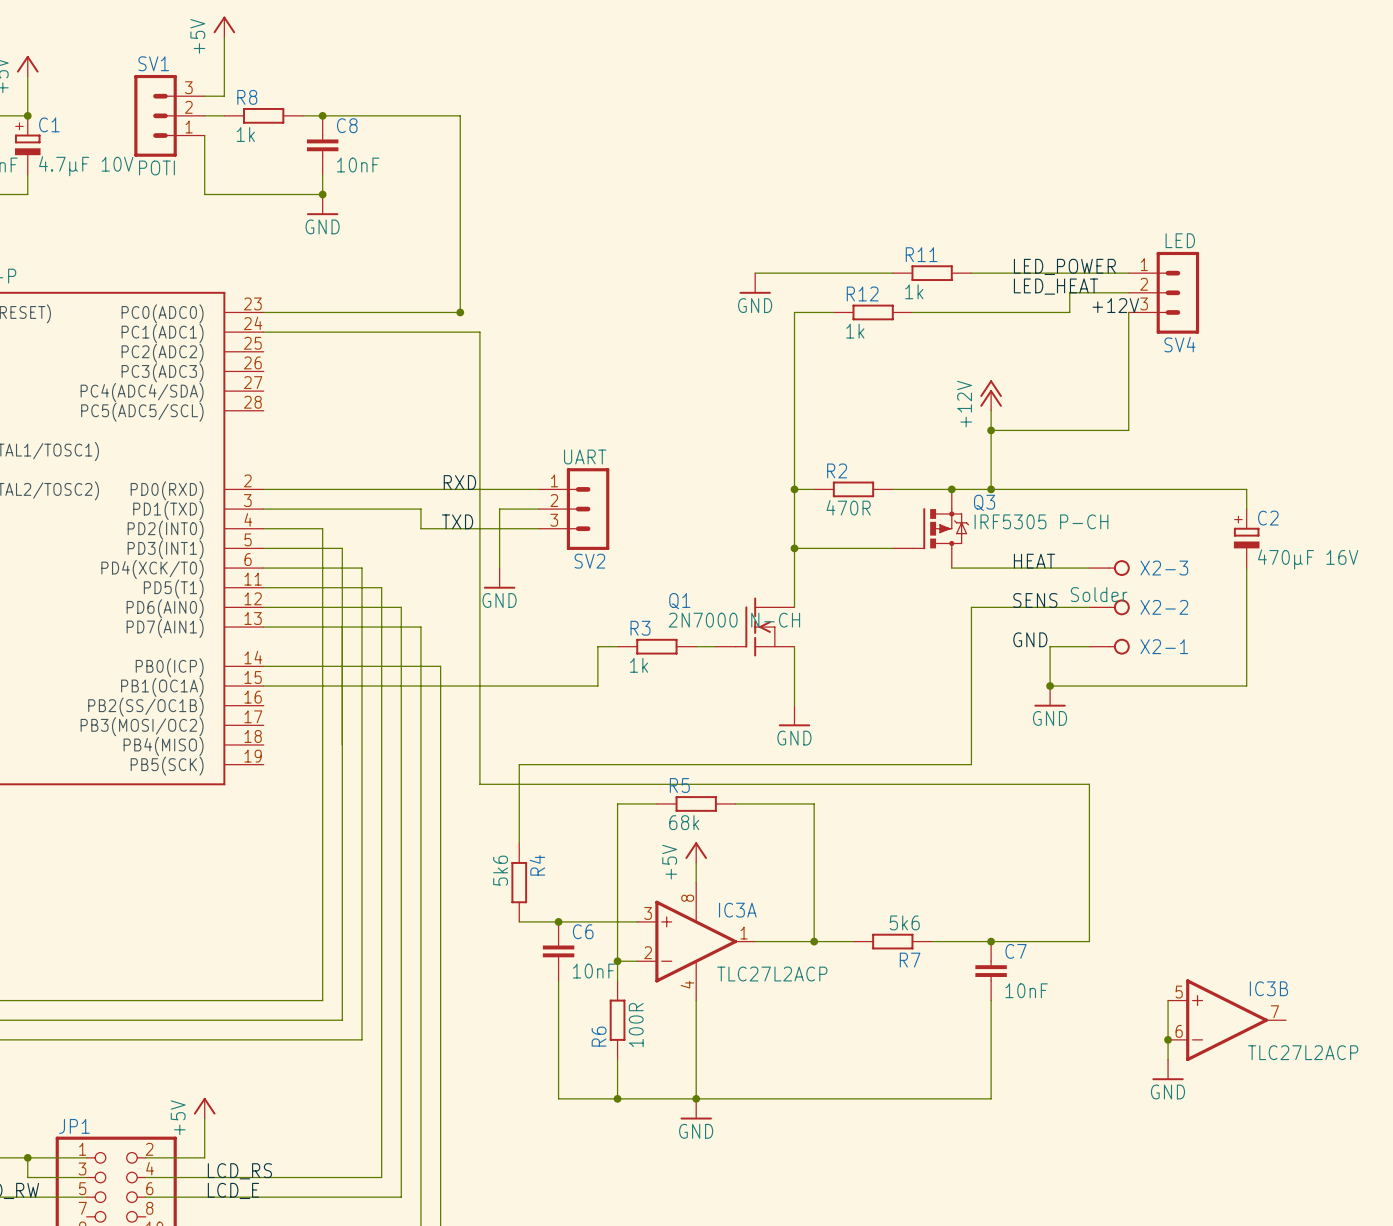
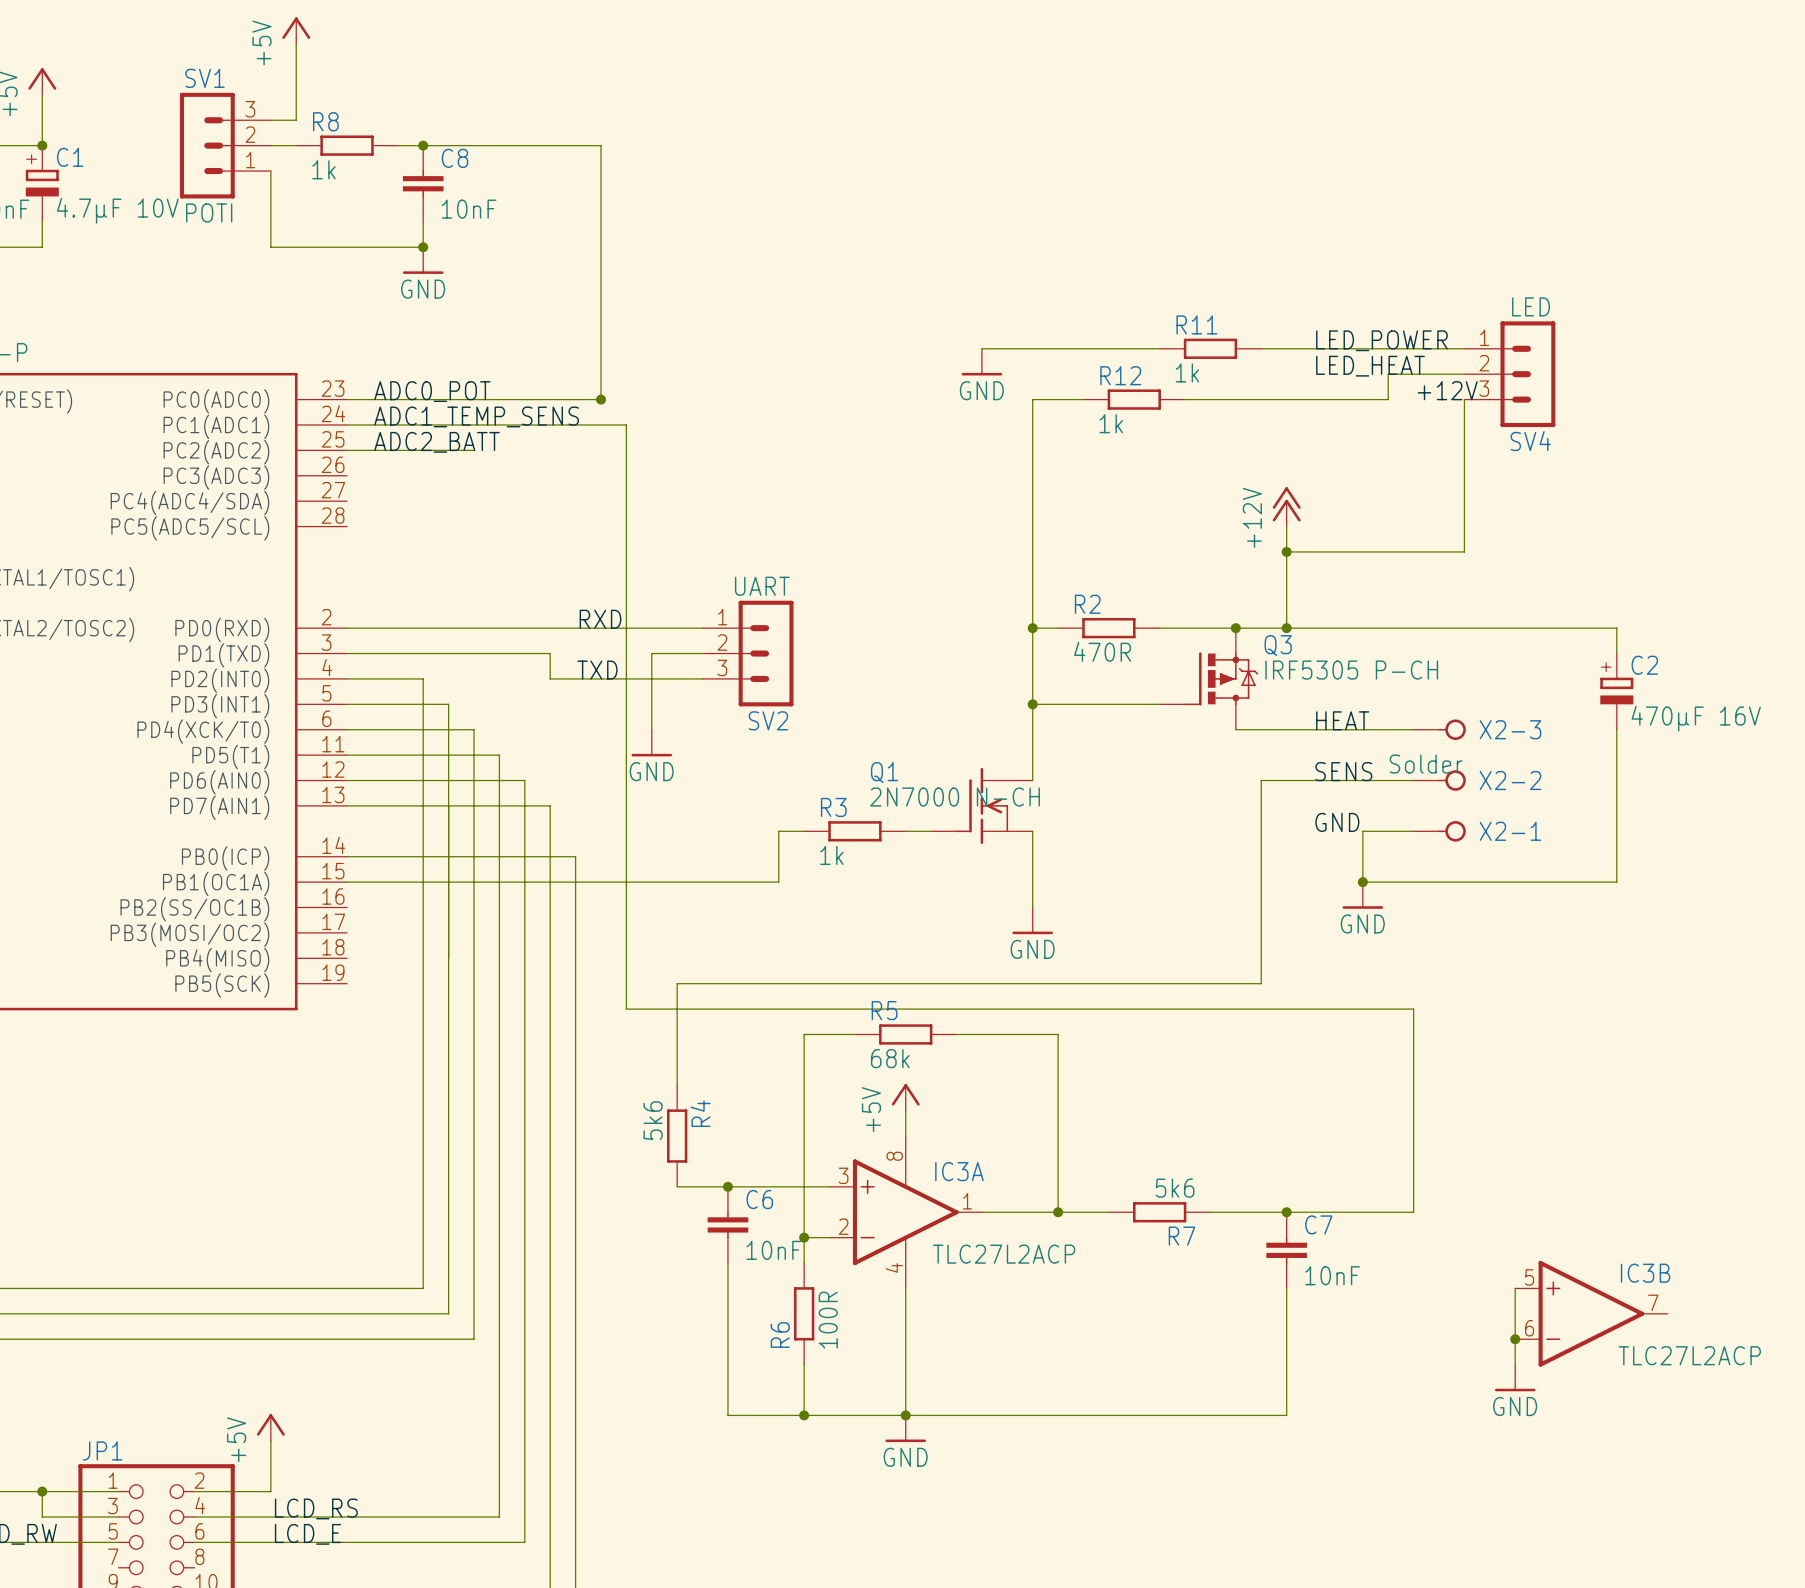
label: none -> ADC0_POT (432, 391)
label: none -> ADC1_TEMP_SENS (476, 416)
label: none -> ADC2_BATT (436, 442)
wire: none -> (347, 450) (474, 450)

